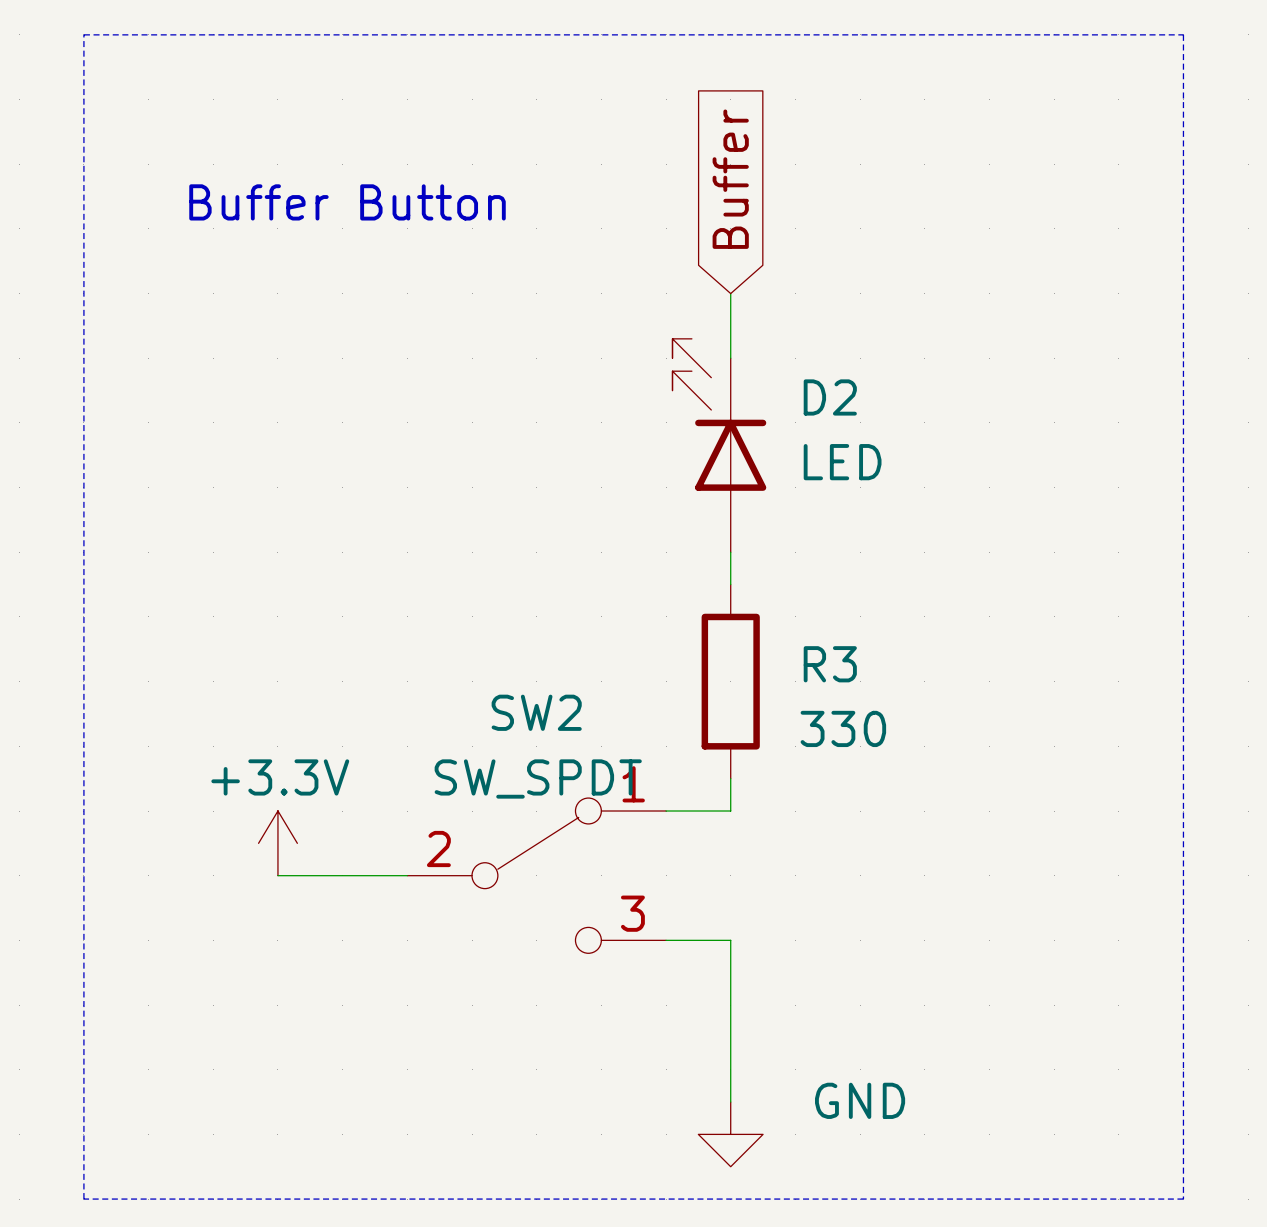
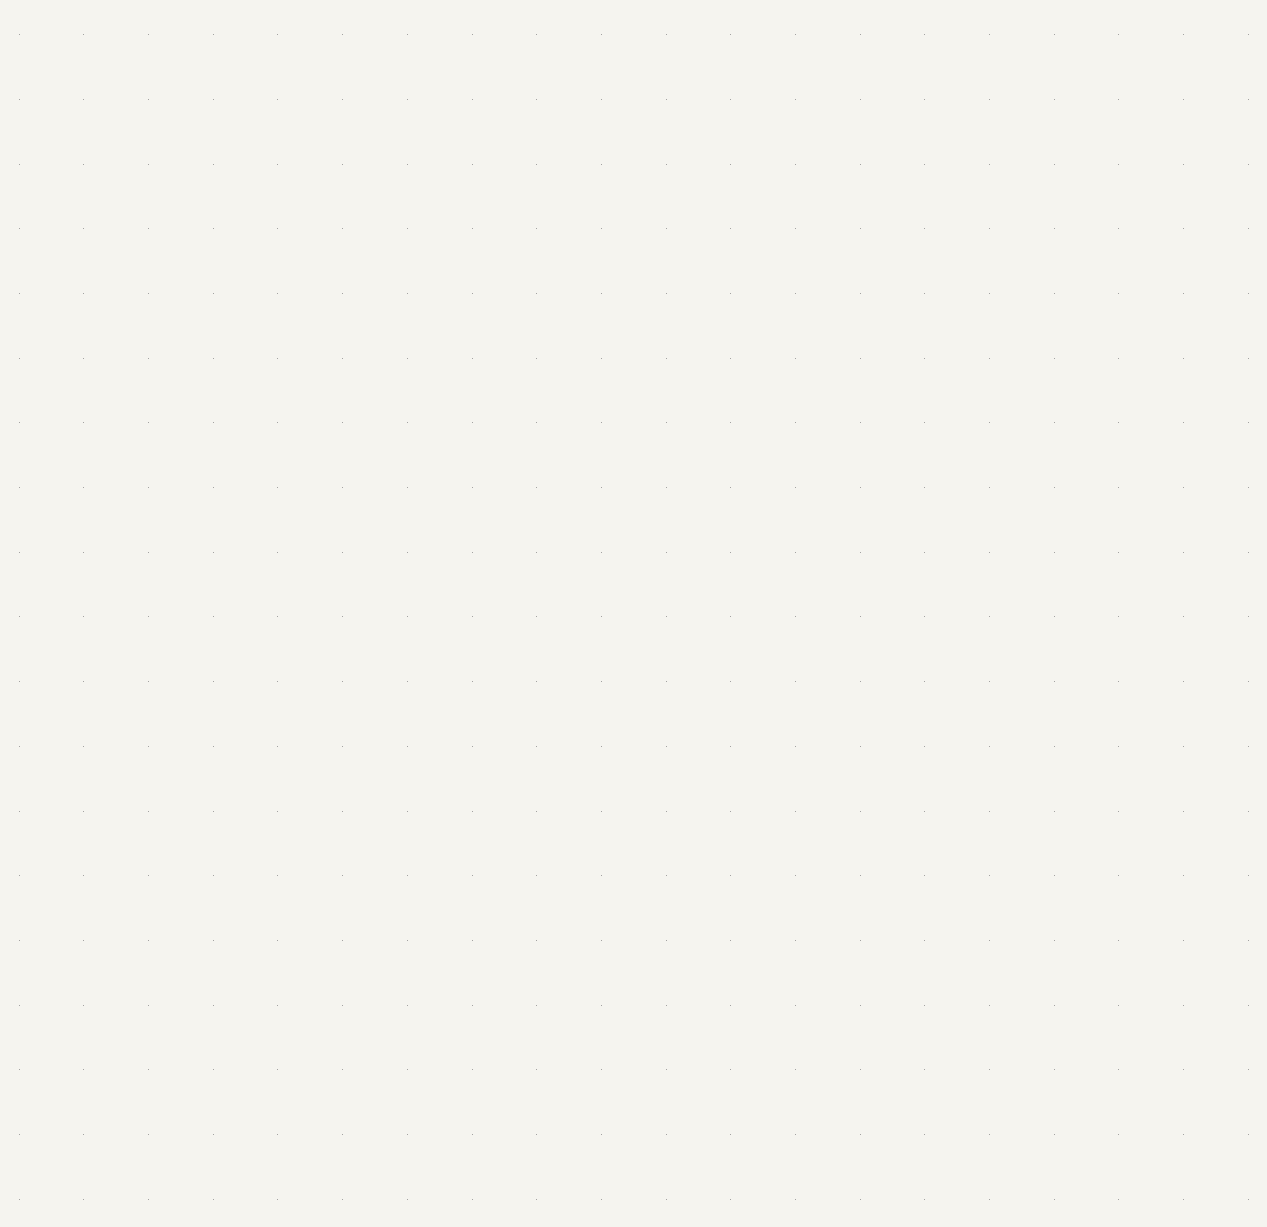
line: (83, 34) (1183, 34) (1183, 1199) (83, 1199) (83, 34) -> none
global label: Buffer (730, 179) -> none
text: Buffer Button (347, 202) -> none
wire: (730, 293) (730, 358) -> none
D2: LED (719, 445) -> none
wire: (730, 552) (730, 584) -> none
R3: 330 (730, 681) -> none
wire: (730, 778) (730, 811) (666, 811) -> none
power symbol: +3.3V (277, 843) -> none
wire: (277, 875) (407, 875) -> none
SW2: SW_SPDT (536, 875) -> none
wire: (666, 940) (730, 940) (730, 1102) -> none
power symbol: GND (730, 1134) -> none

